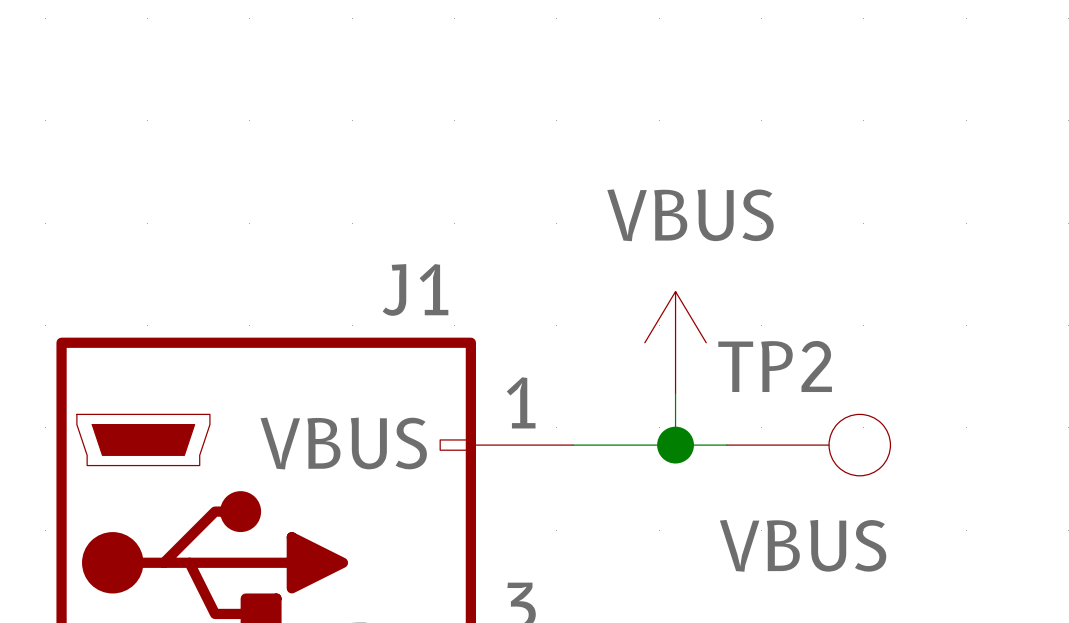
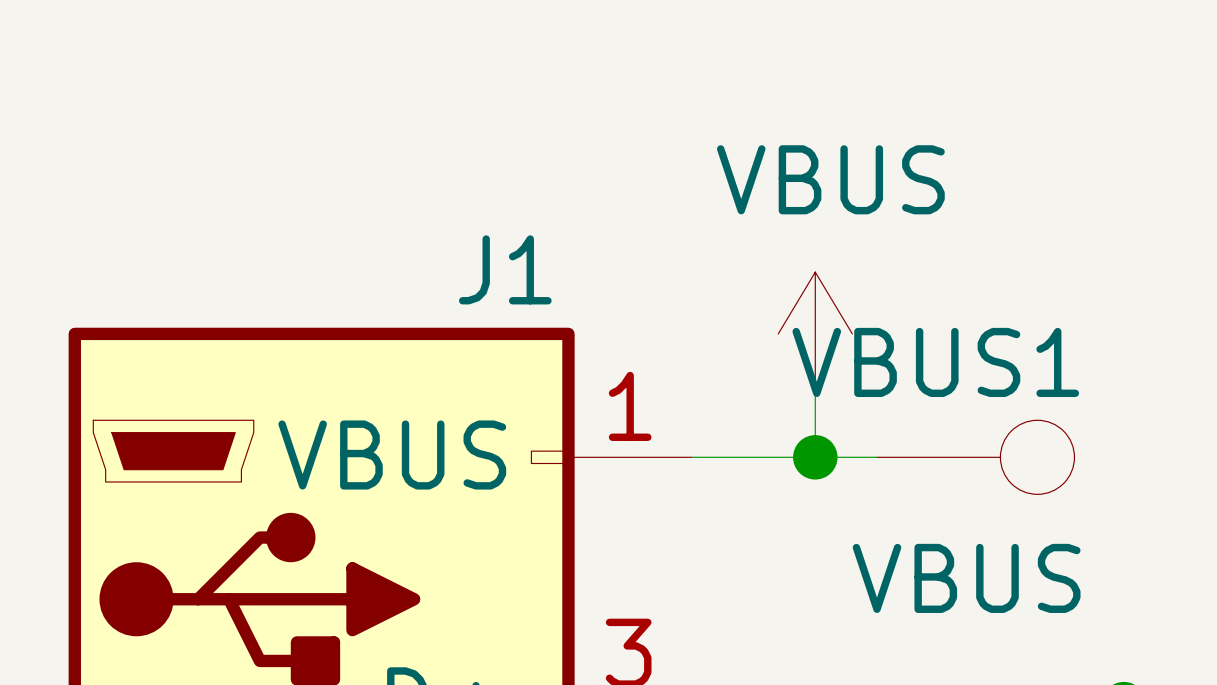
TP2 name: TP2 (775, 366) -> VBUS1 (935, 362)

